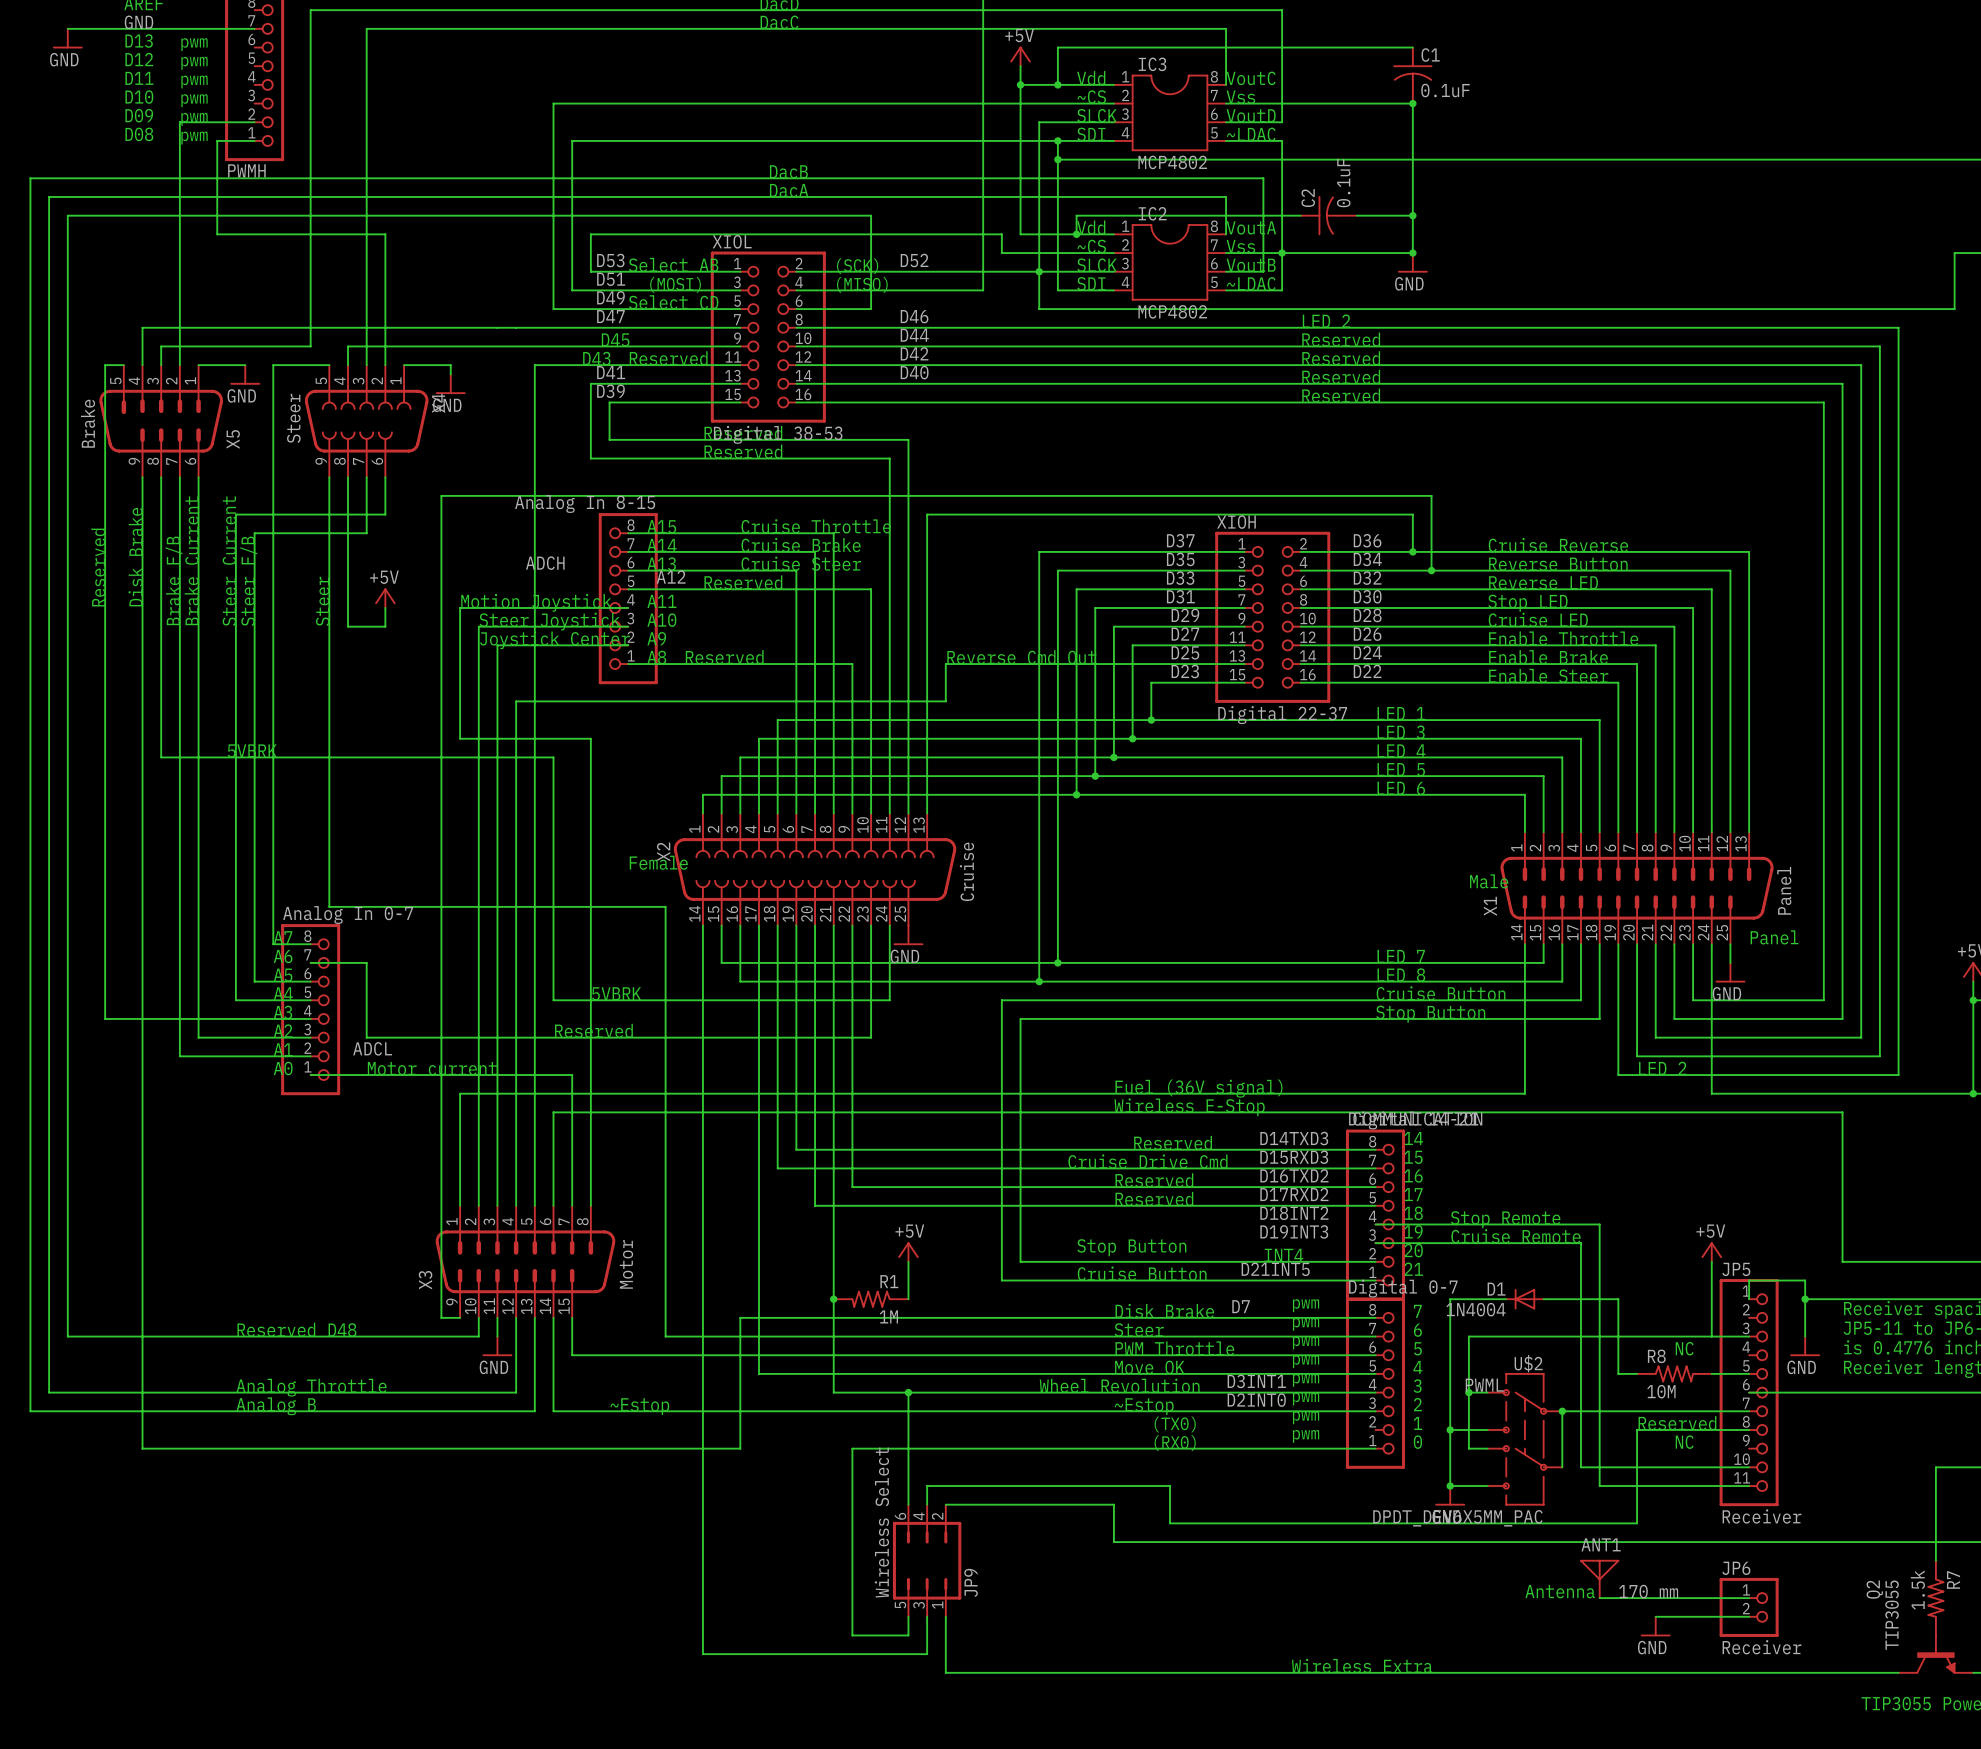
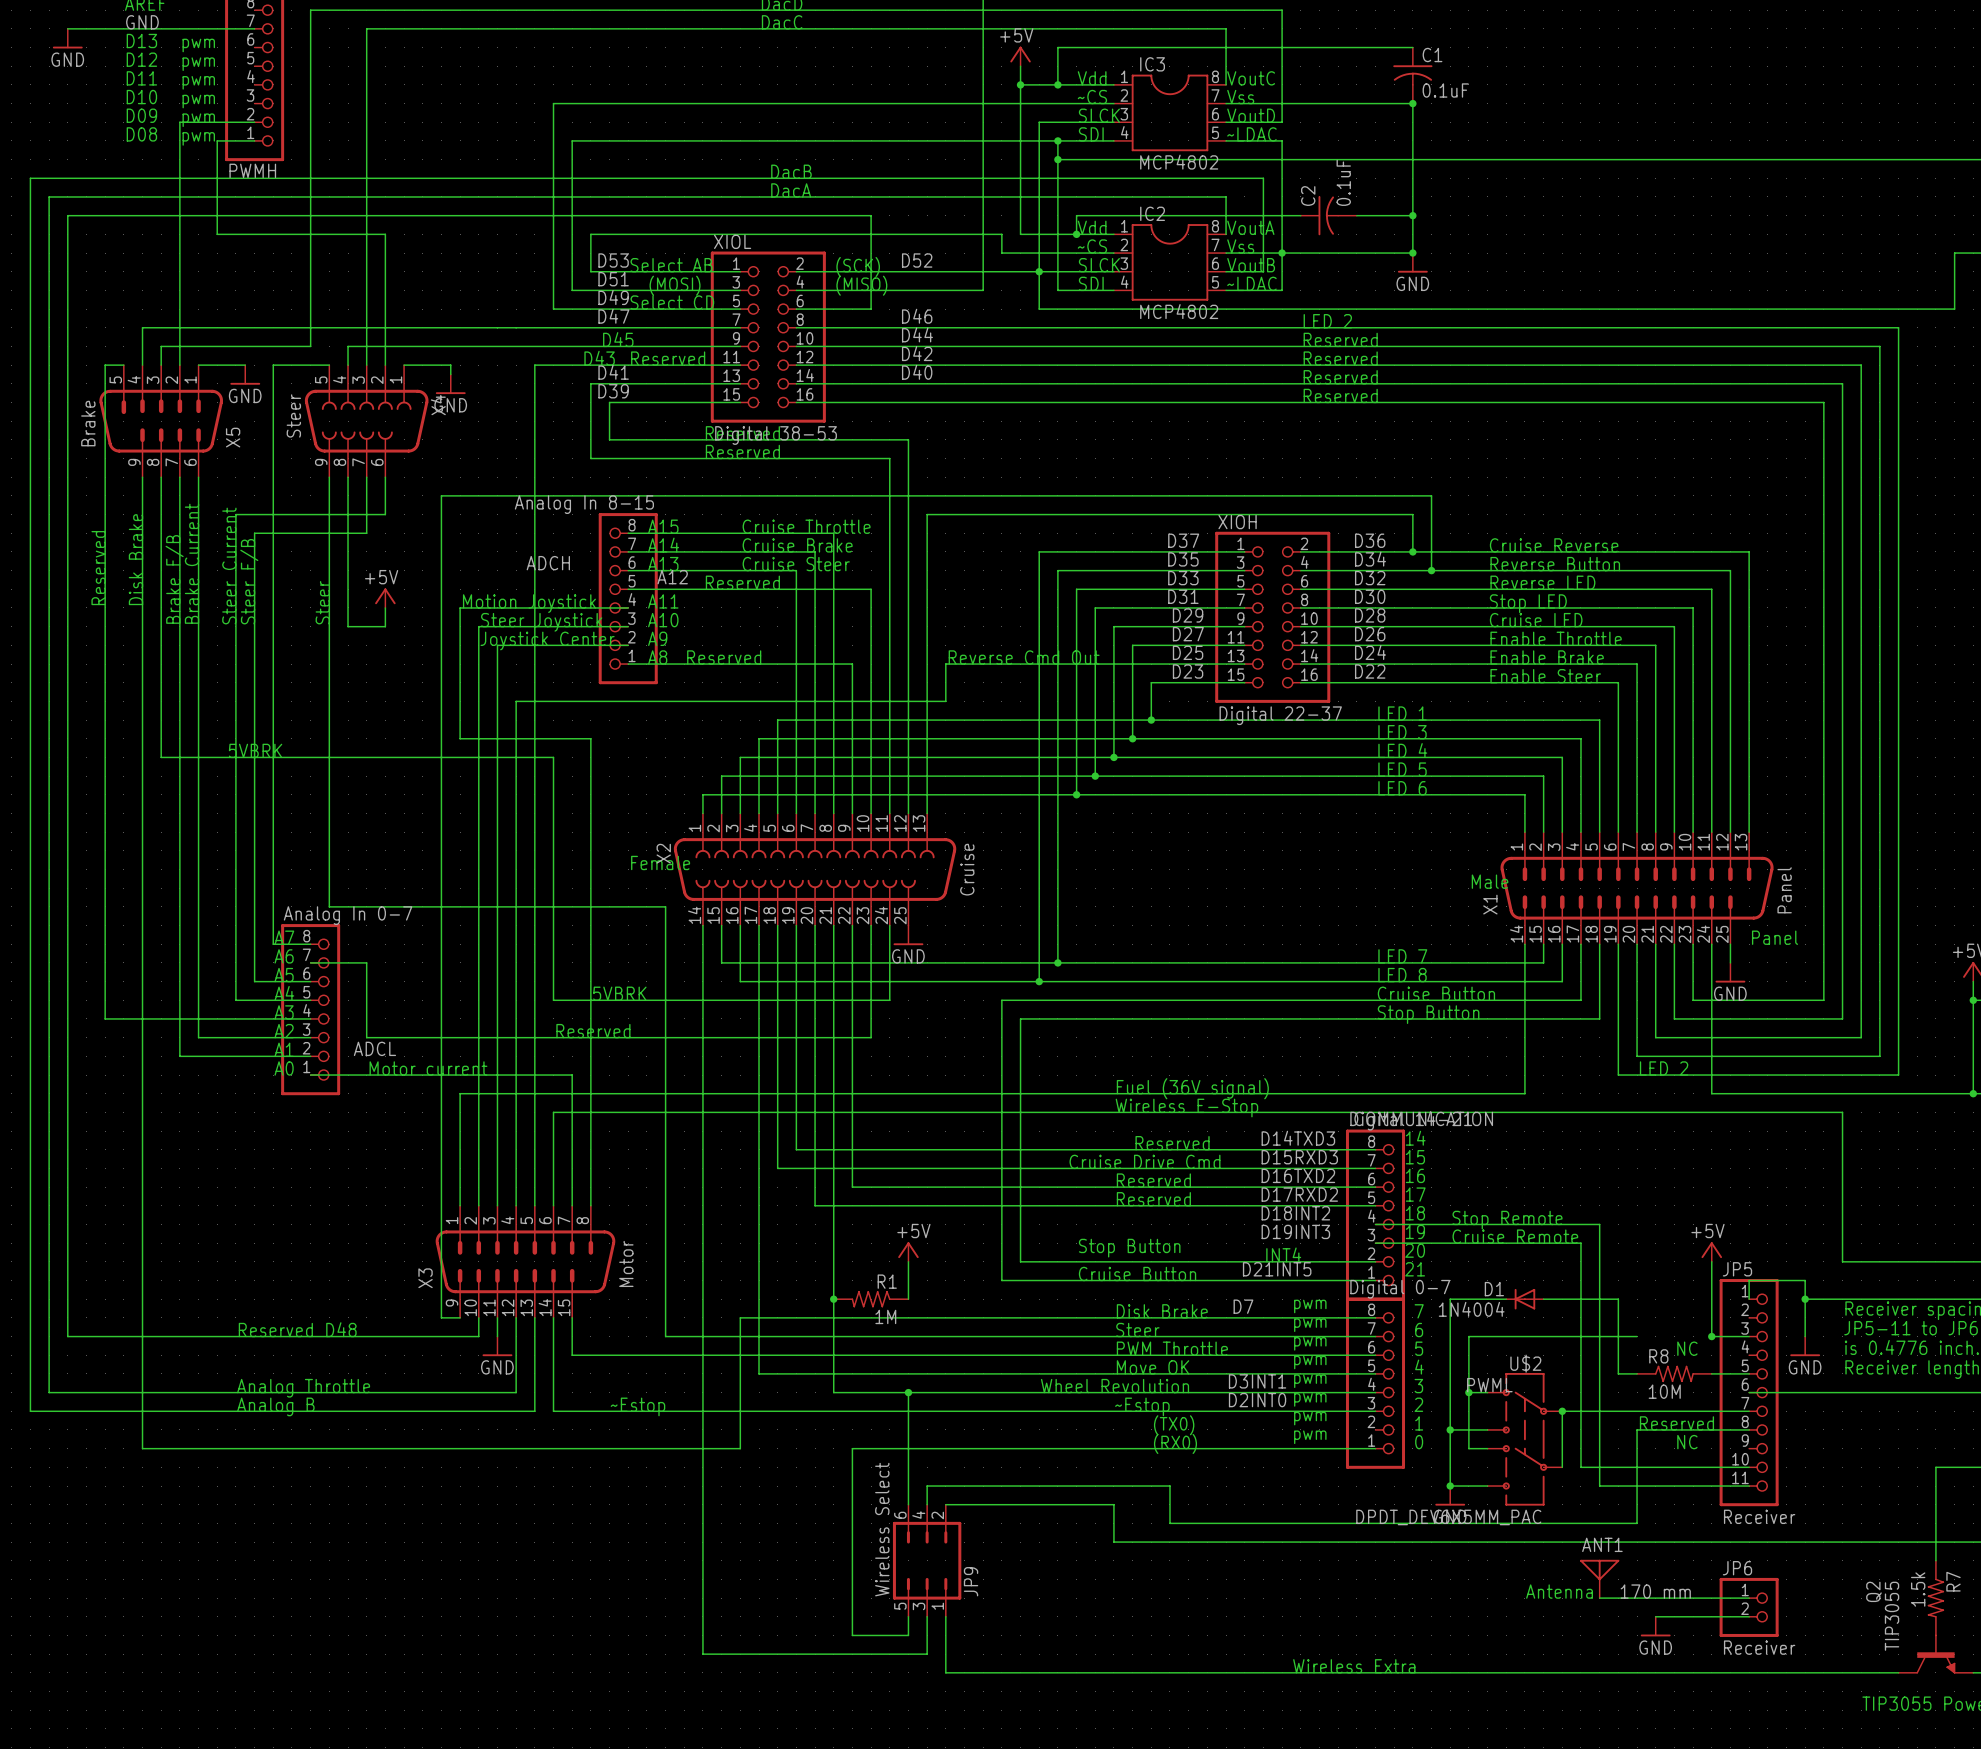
wire: (1637, 1336) (1711, 1336) -> none
junction: none -> (1711, 1336)

